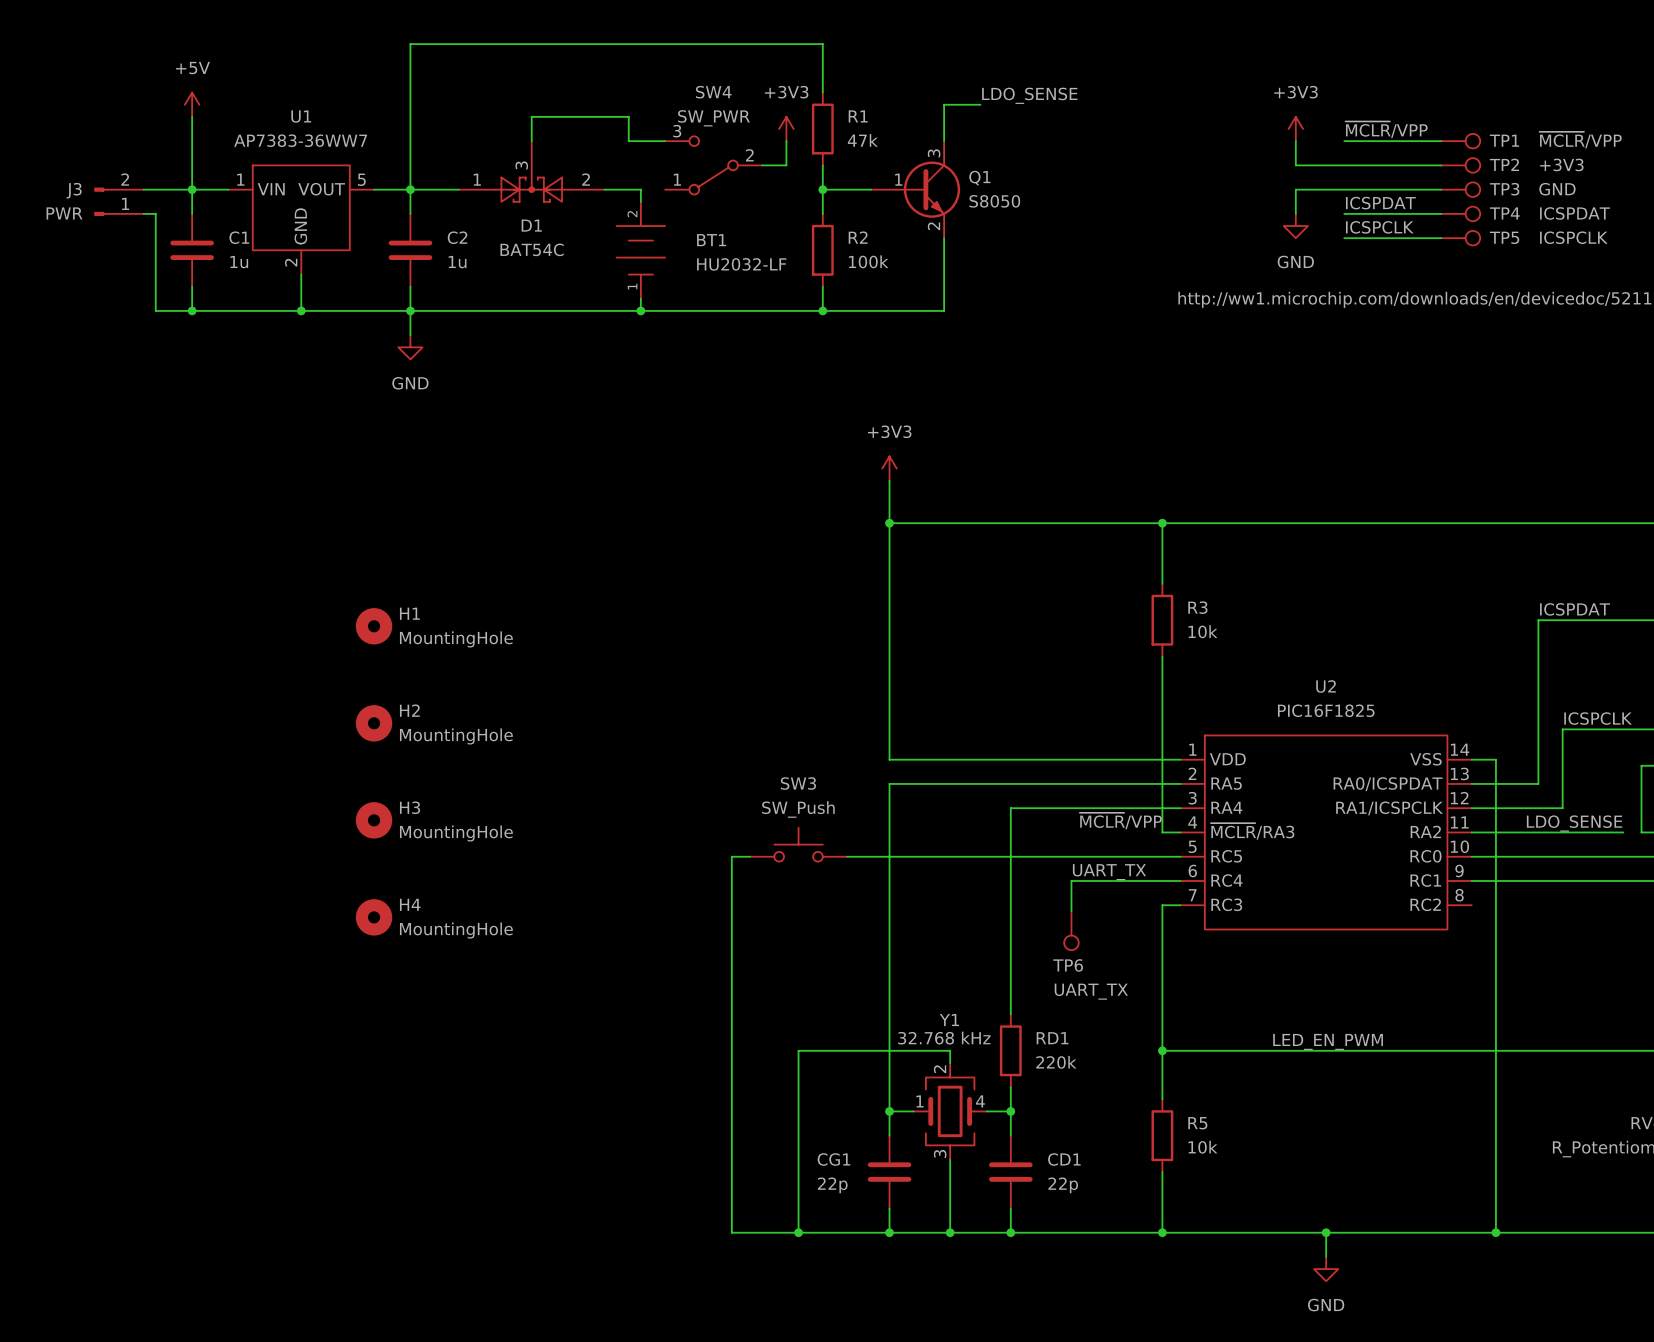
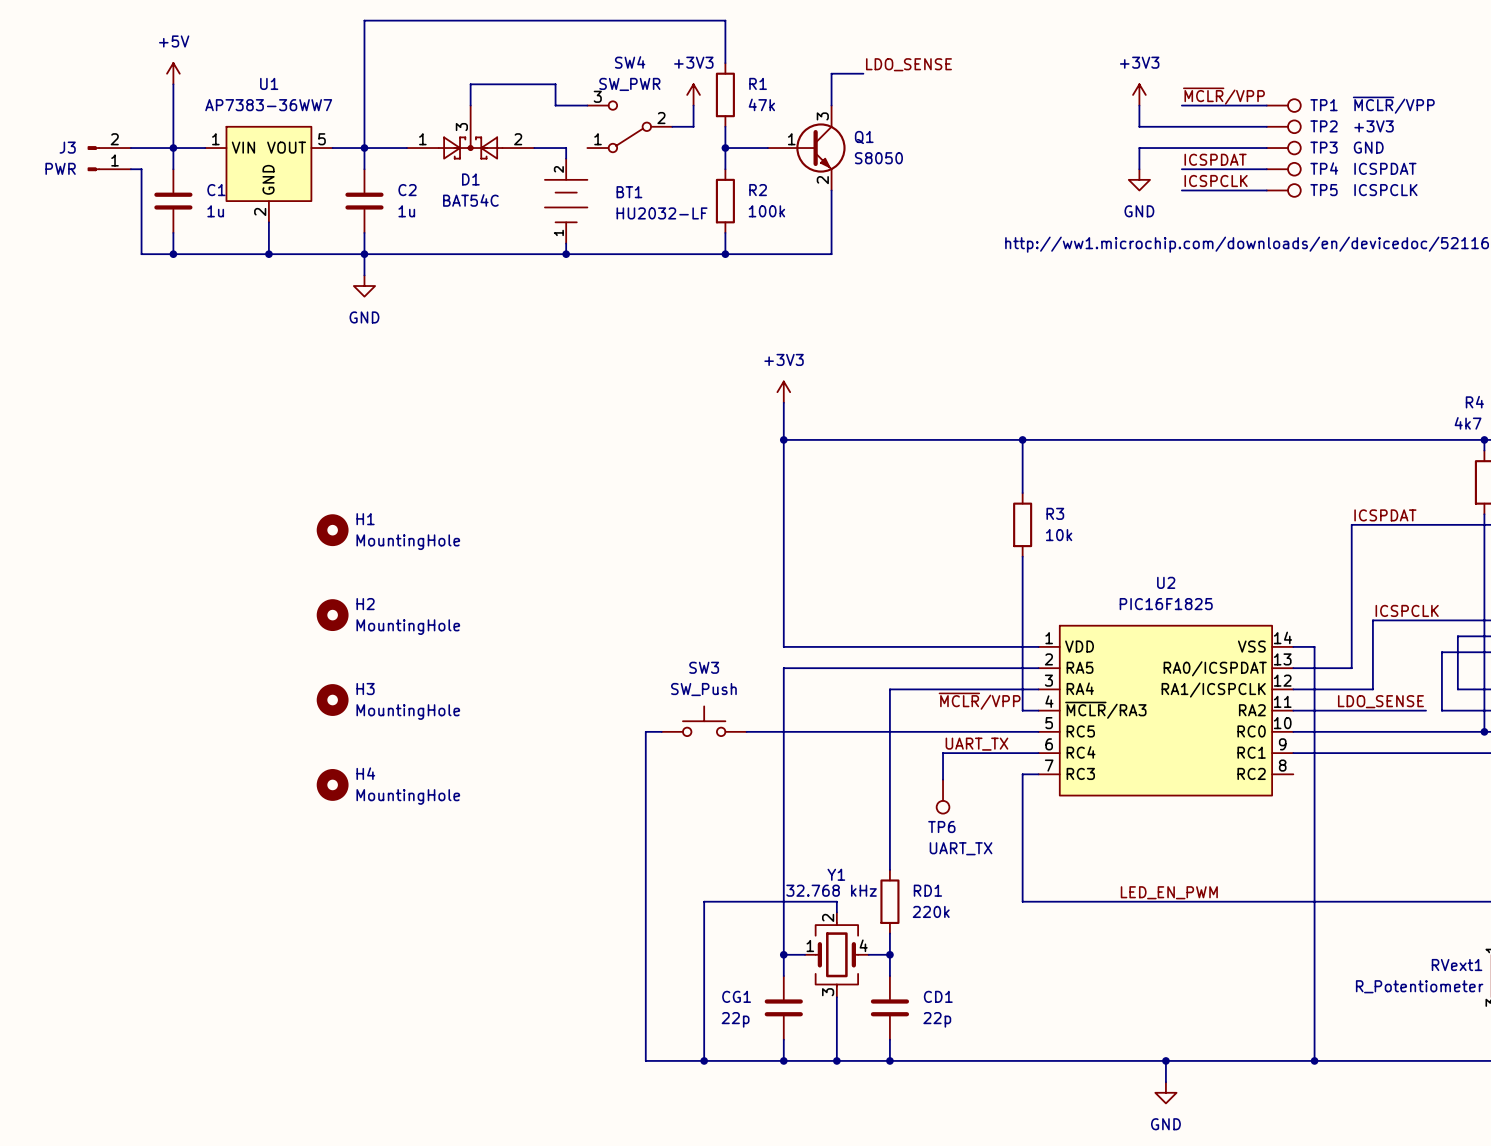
wire: (1162, 1050) (1162, 1099) -> none
junction: (1162, 1050) -> none
R5: 10k (1162, 1135) -> none
wire: (1162, 1172) (1162, 1232) -> none
junction: (1162, 1232) -> none

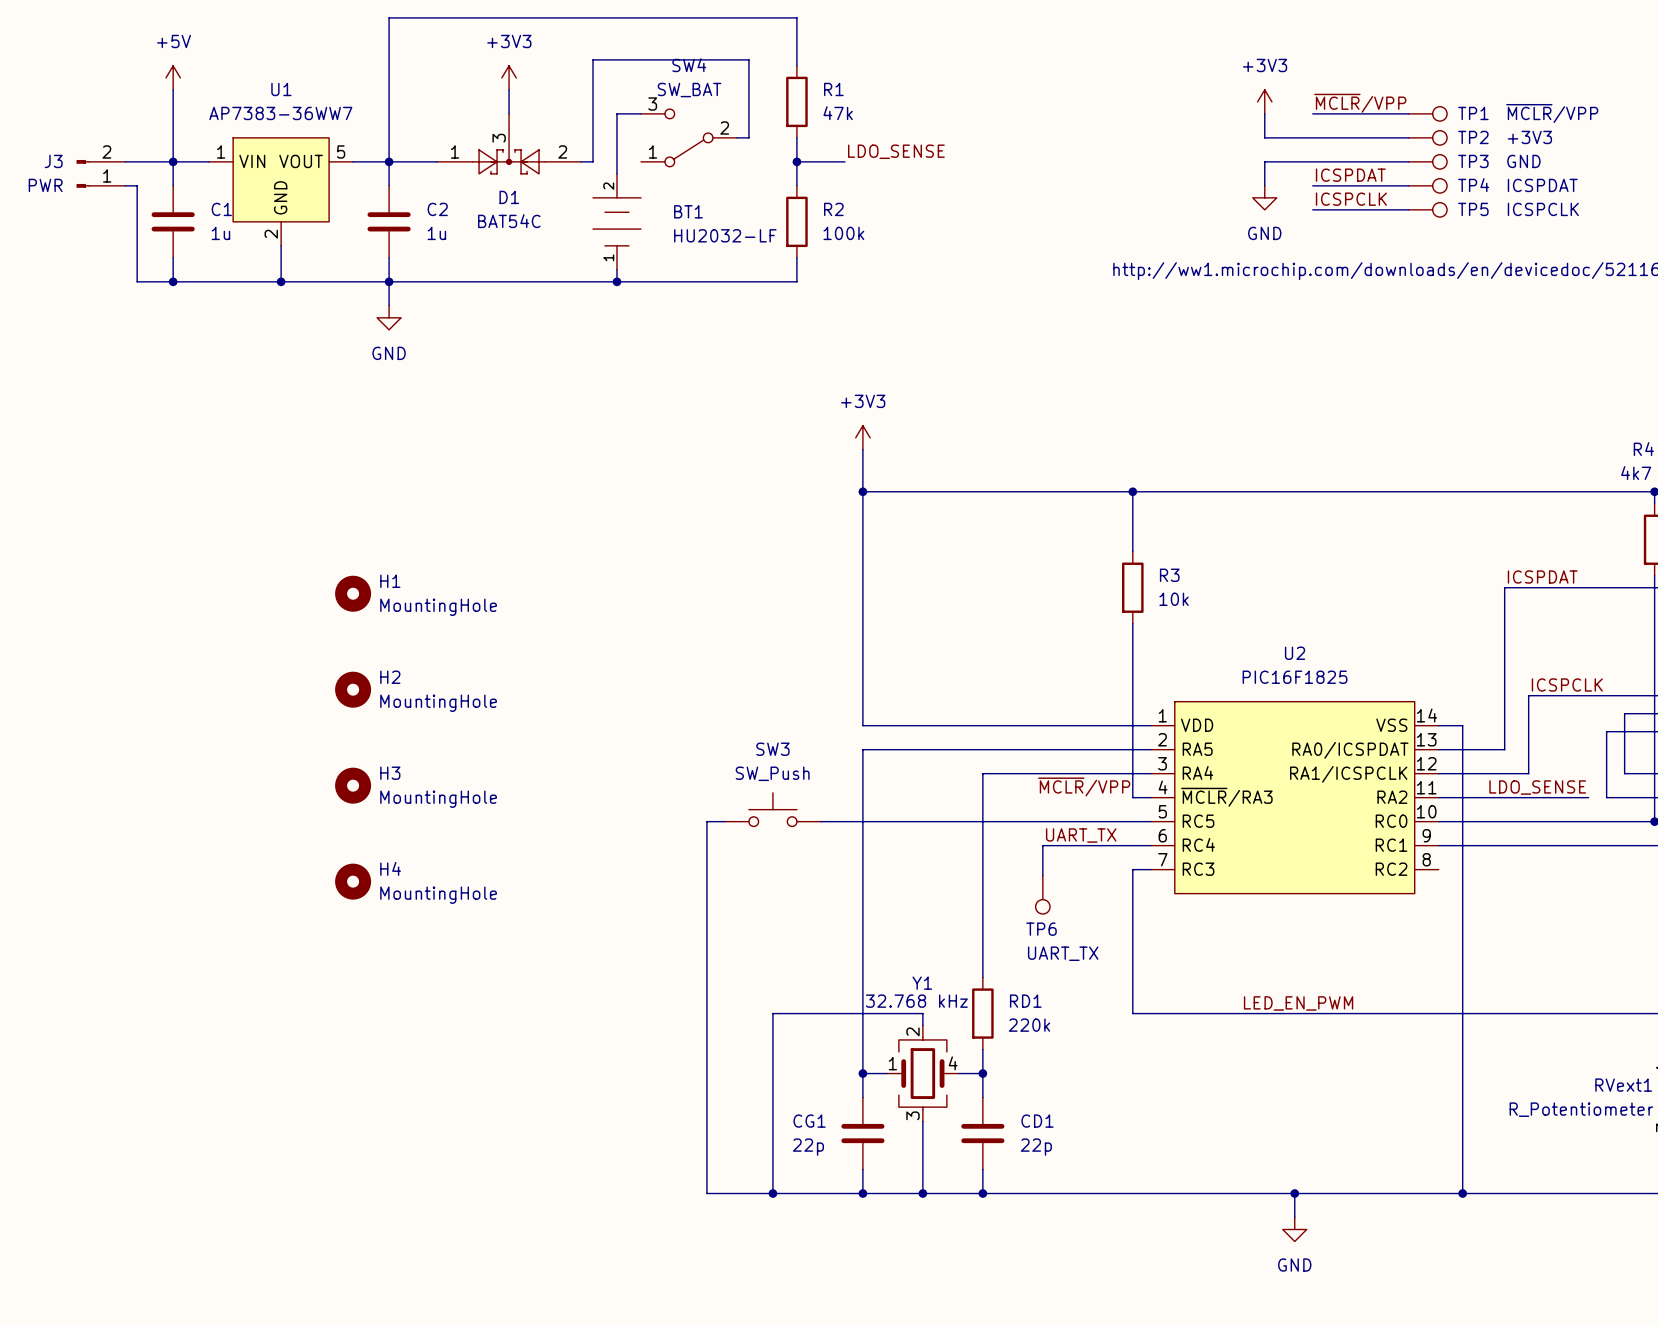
label position: LDO_SENSE (908, 64) -> LDO_SENSE (896, 151)
power symbol: none -> +3V3 (509, 77)
wire: (863, 73) (831, 73) (831, 105) -> none
wire: (470, 84) (555, 84) (555, 105) (566, 105) -> none
SW4 value: SW_PWR (629, 84) -> SW_BAT (689, 90)
power symbol: +3V3 (693, 94) -> none
wire: (693, 105) (693, 126) (682, 126) -> (593, 161) (593, 59) (748, 59) (748, 137)
wire: (544, 148) (566, 148) -> (616, 113) (616, 161)
Q1: S8050 (806, 148) -> none
wire: (831, 190) (831, 254) (725, 254) -> none
junction: (725, 254) -> none

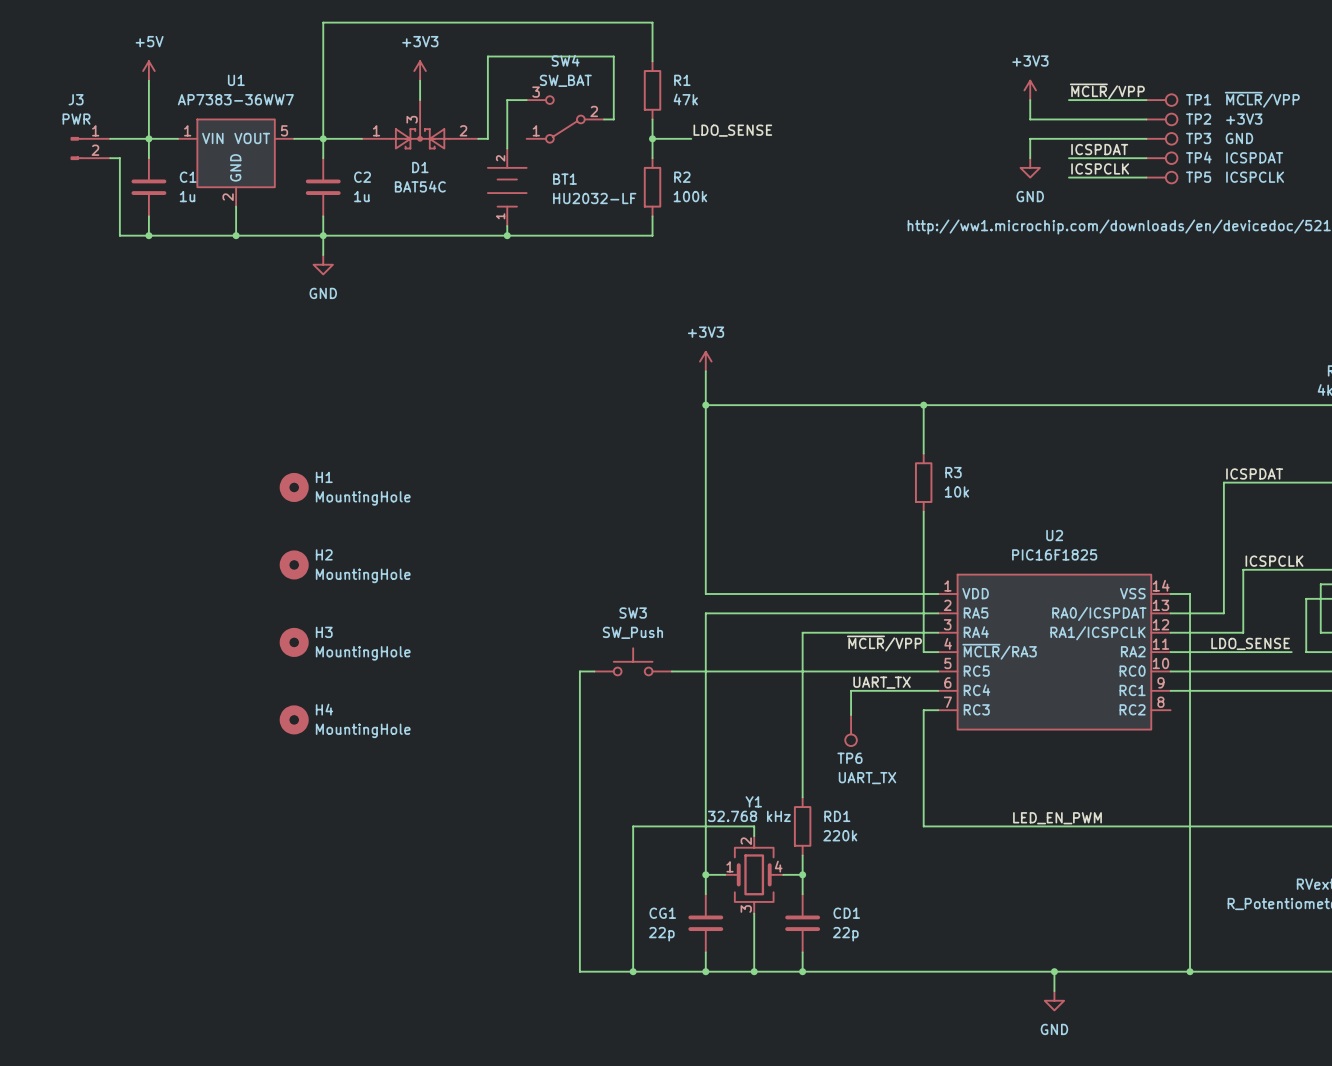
J3 name position: J3 (53, 161) -> J3 (76, 99)
J3 flip: as is (83, 173) -> up-down (76, 148)
J3 value position: PWR (45, 185) -> PWR (76, 119)

